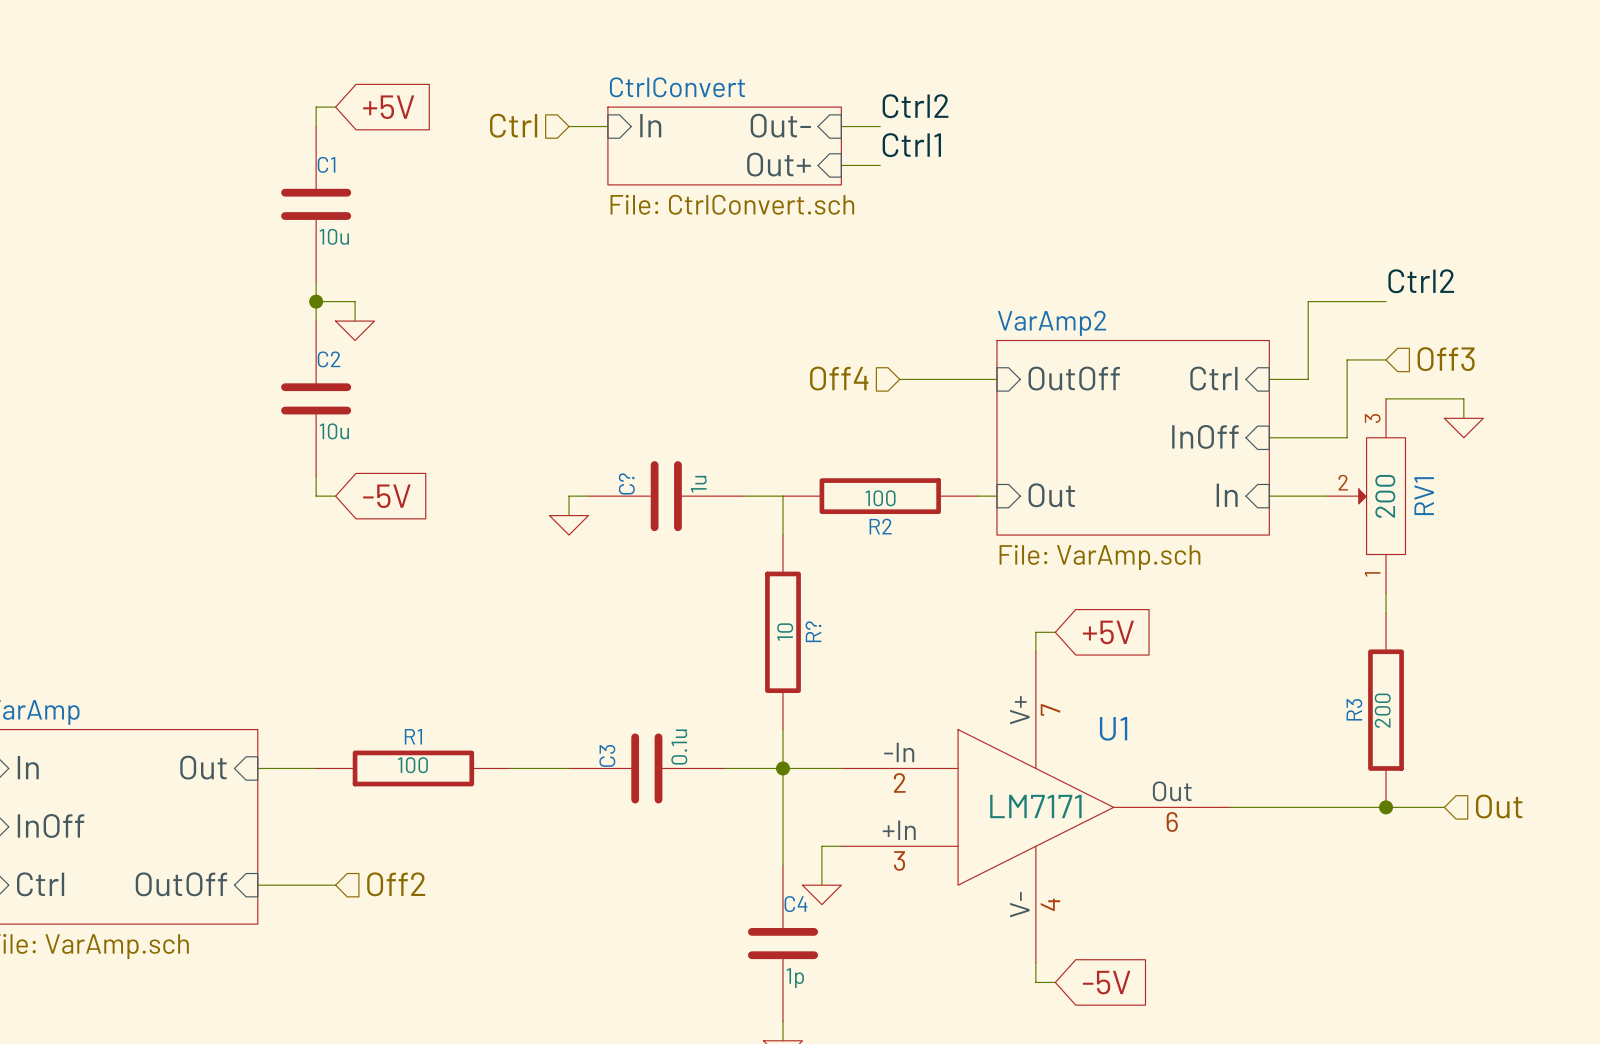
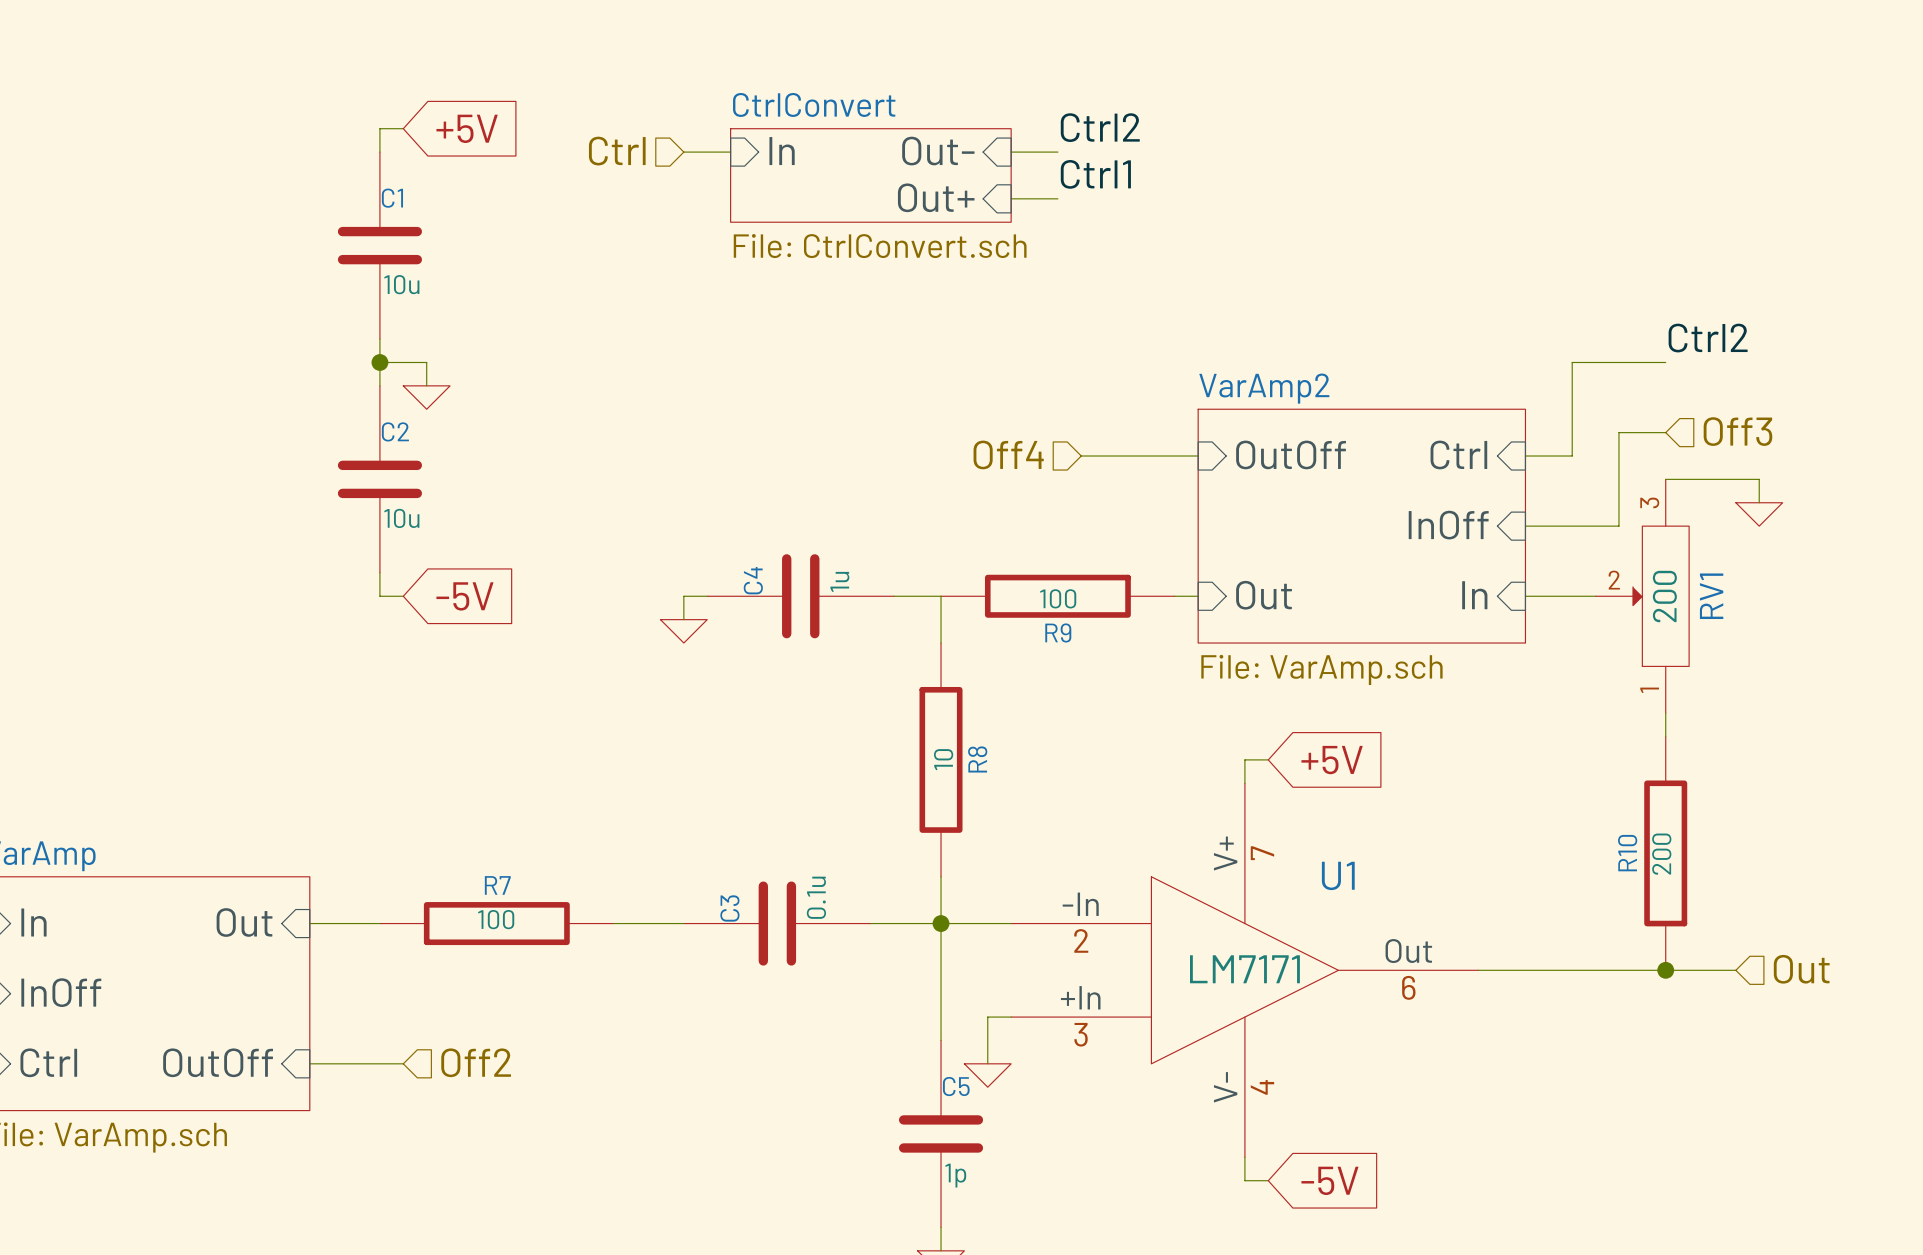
C? name: C? (626, 483) -> C4 (753, 580)
R2 name: R2 (880, 526) -> R9 (1058, 632)
R? name: R? (813, 631) -> R8 (977, 759)
R3 name: R3 (1354, 709) -> R10 (1627, 853)
R1 name: R1 (413, 736) -> R7 (497, 885)
C4 name: C4 (795, 904) -> C5 (956, 1086)

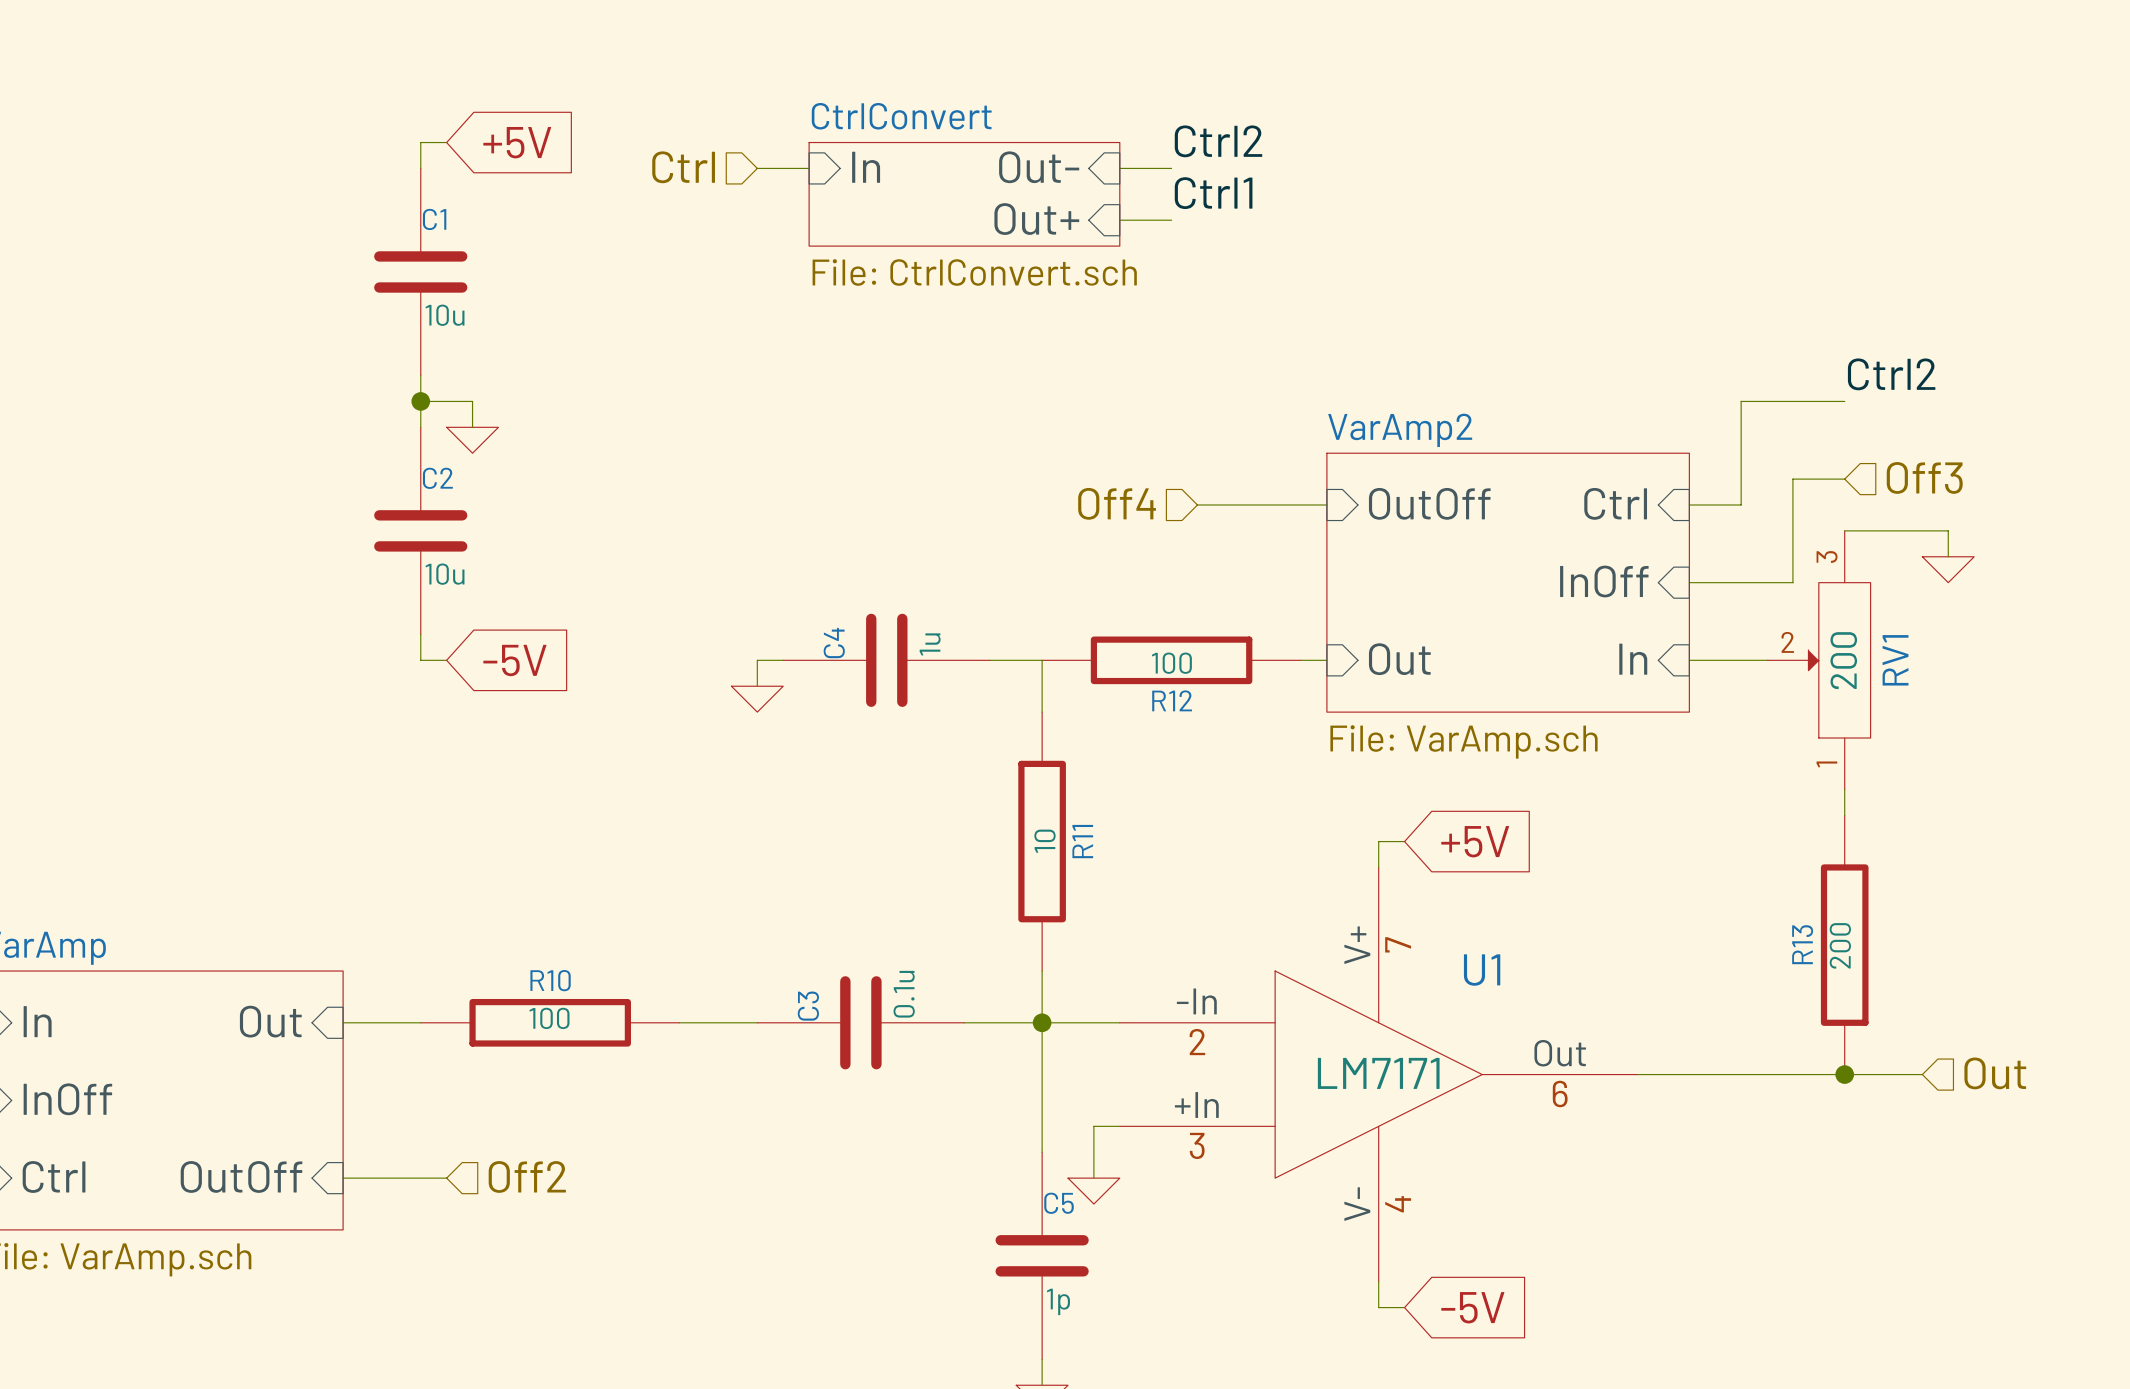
R9 name: R9 (1058, 632) -> R12 (1172, 700)
R8 name: R8 (977, 759) -> R11 (1082, 841)
R10 name: R10 (1627, 853) -> R13 (1802, 944)
R7 name: R7 (497, 885) -> R10 (550, 980)

